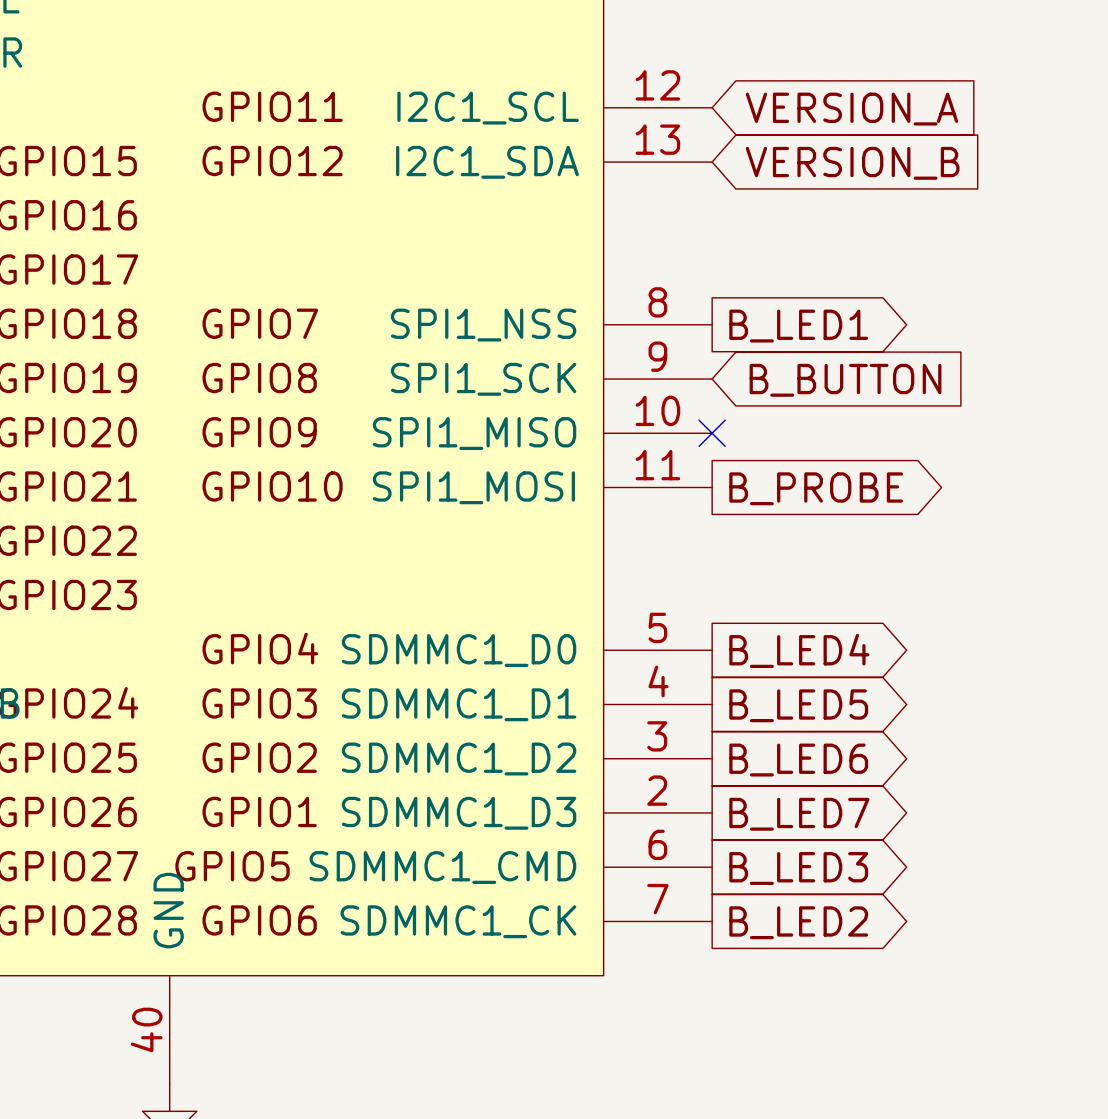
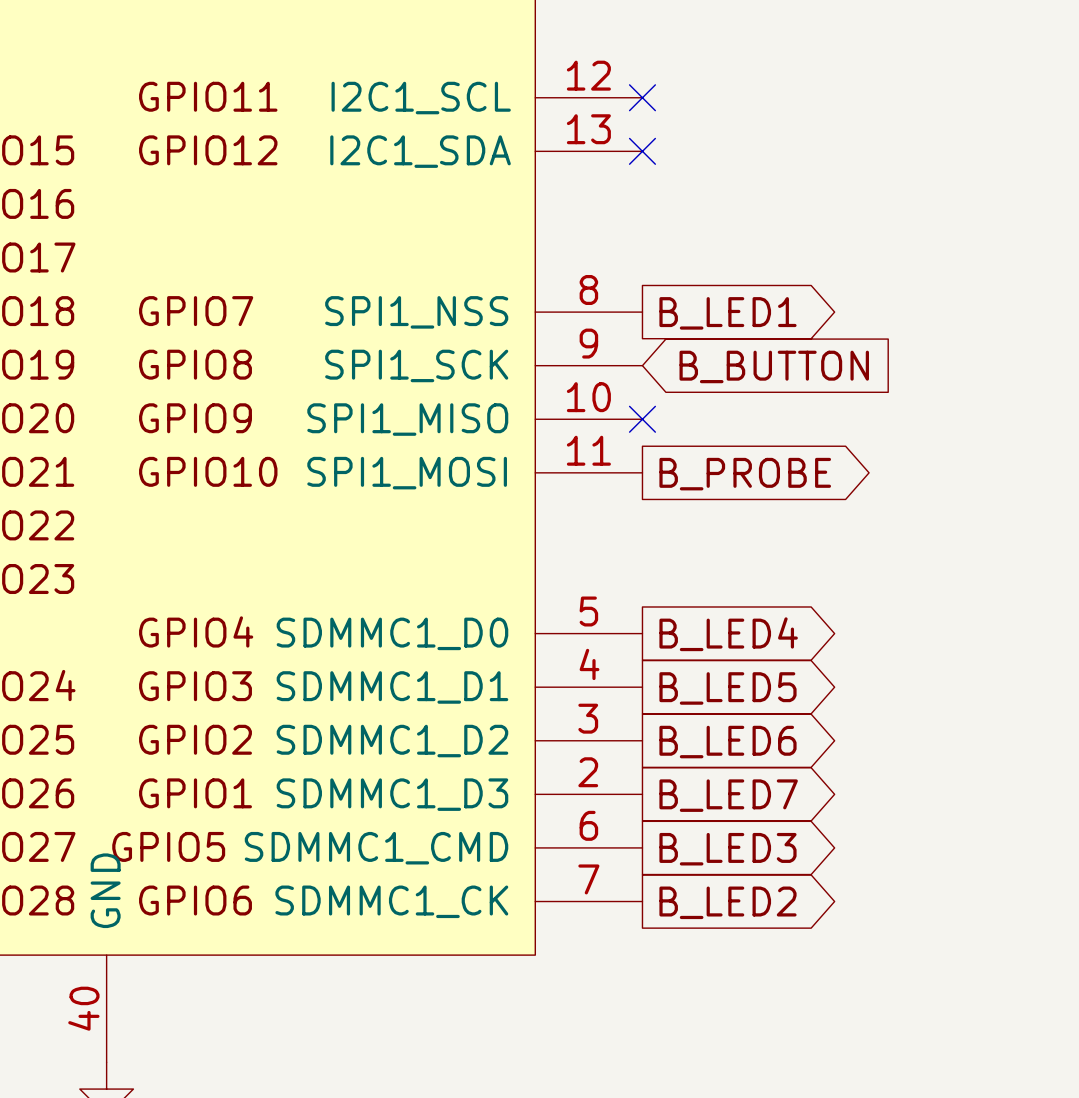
no-connect mark: none -> (642, 97)
global label: VERSION_A (851, 109) -> none
no-connect mark: none -> (642, 151)
global label: VERSION_B (852, 163) -> none

